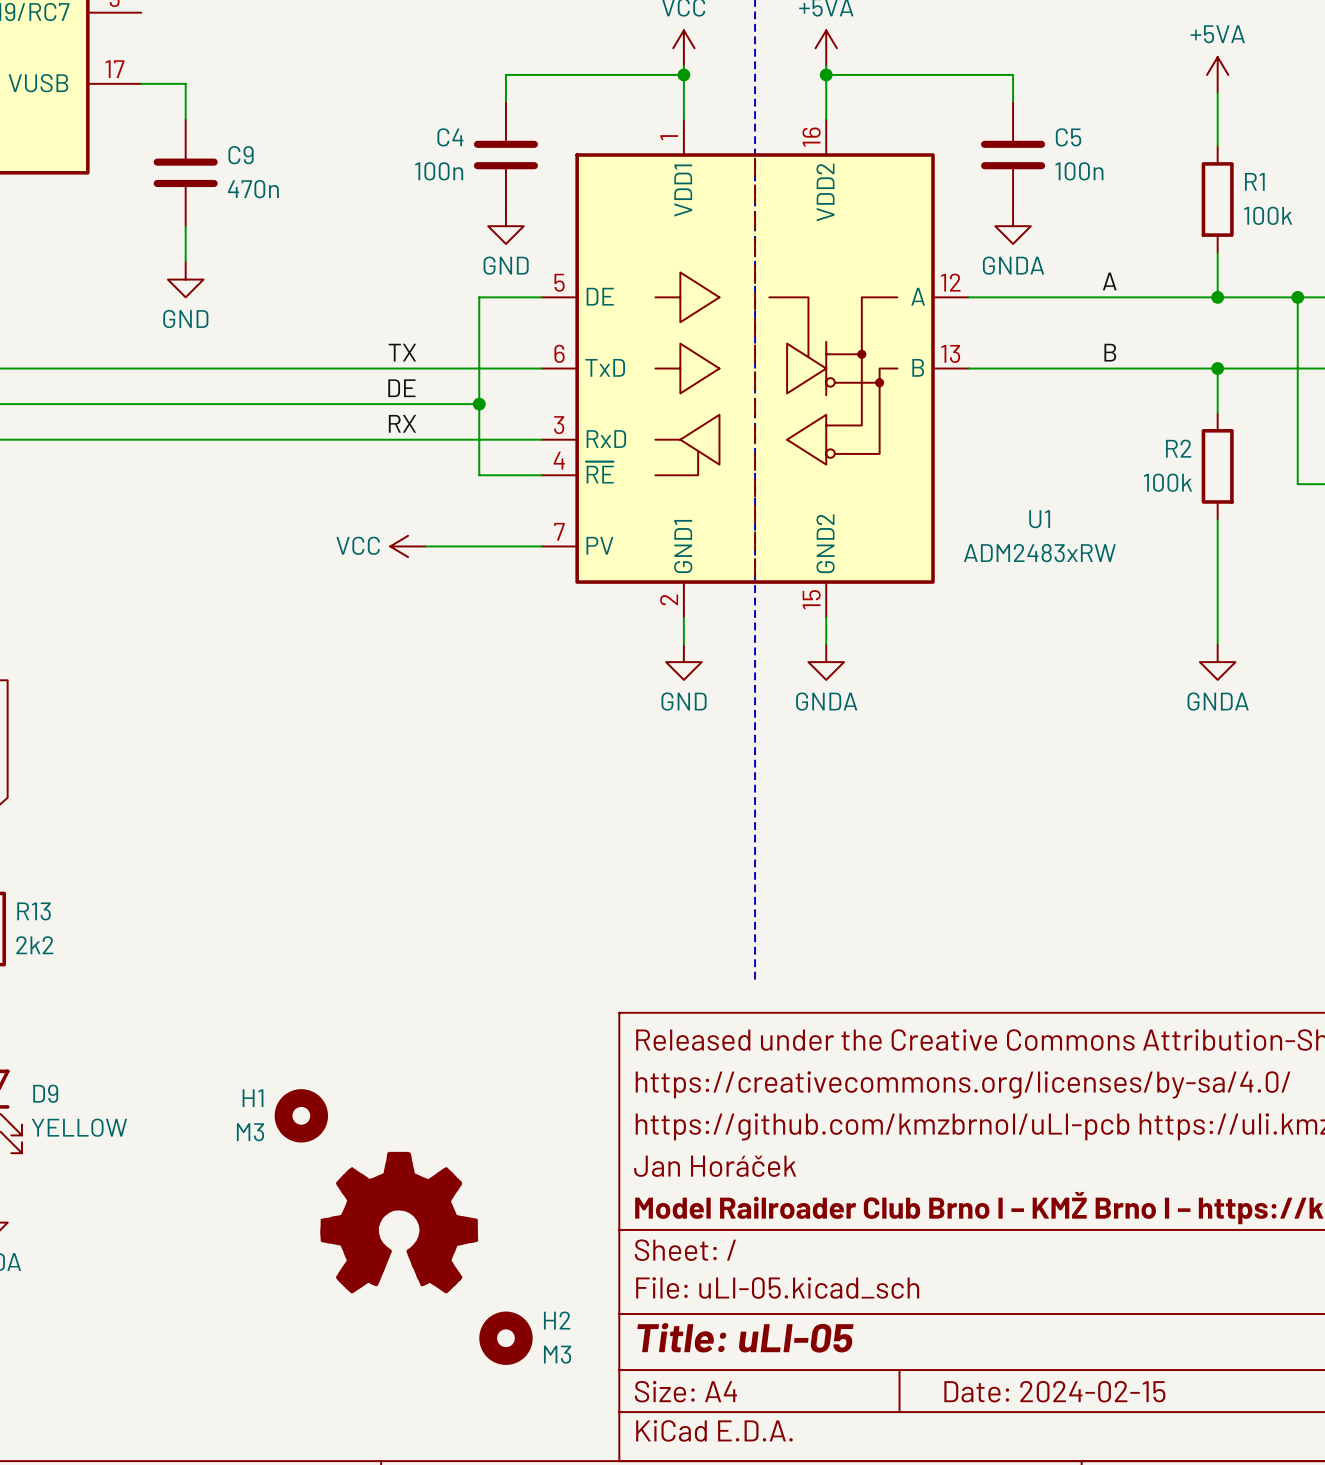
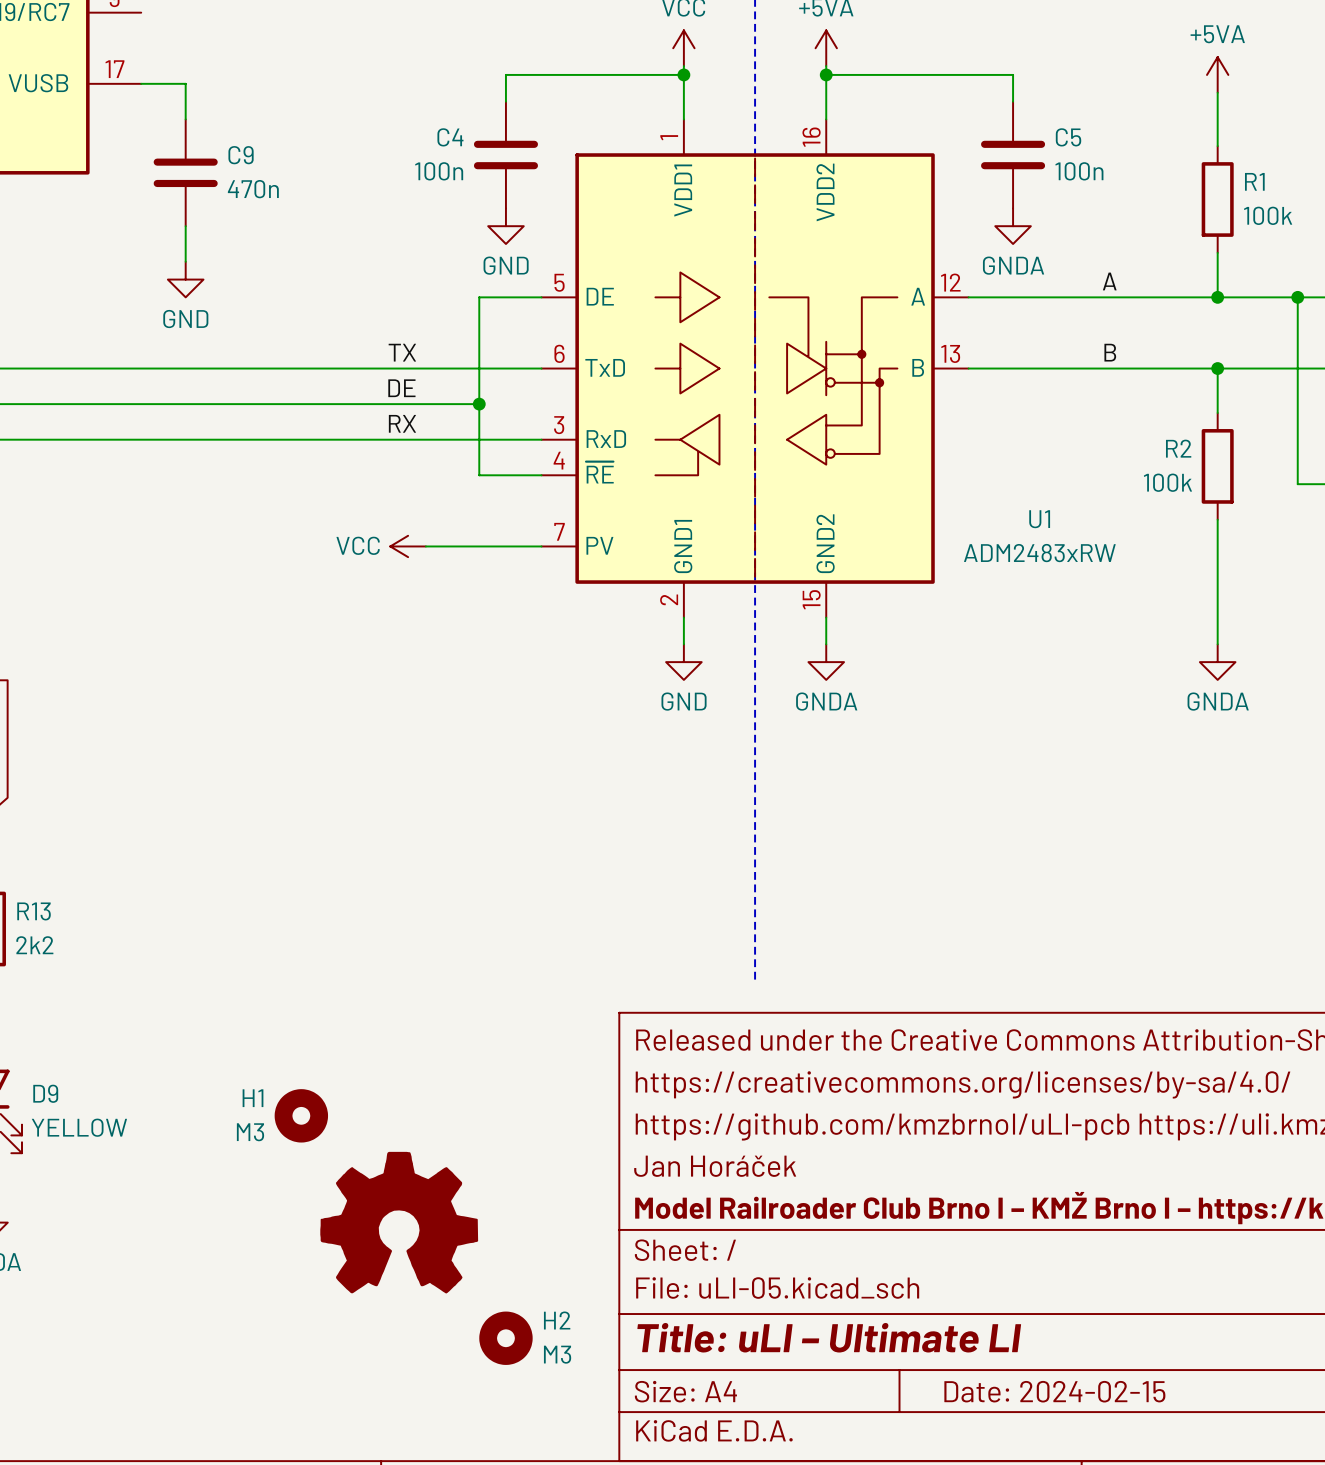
title block: Title: uLI-05 (745, 1337) -> Title: uLI – Ultimate LI (829, 1337)

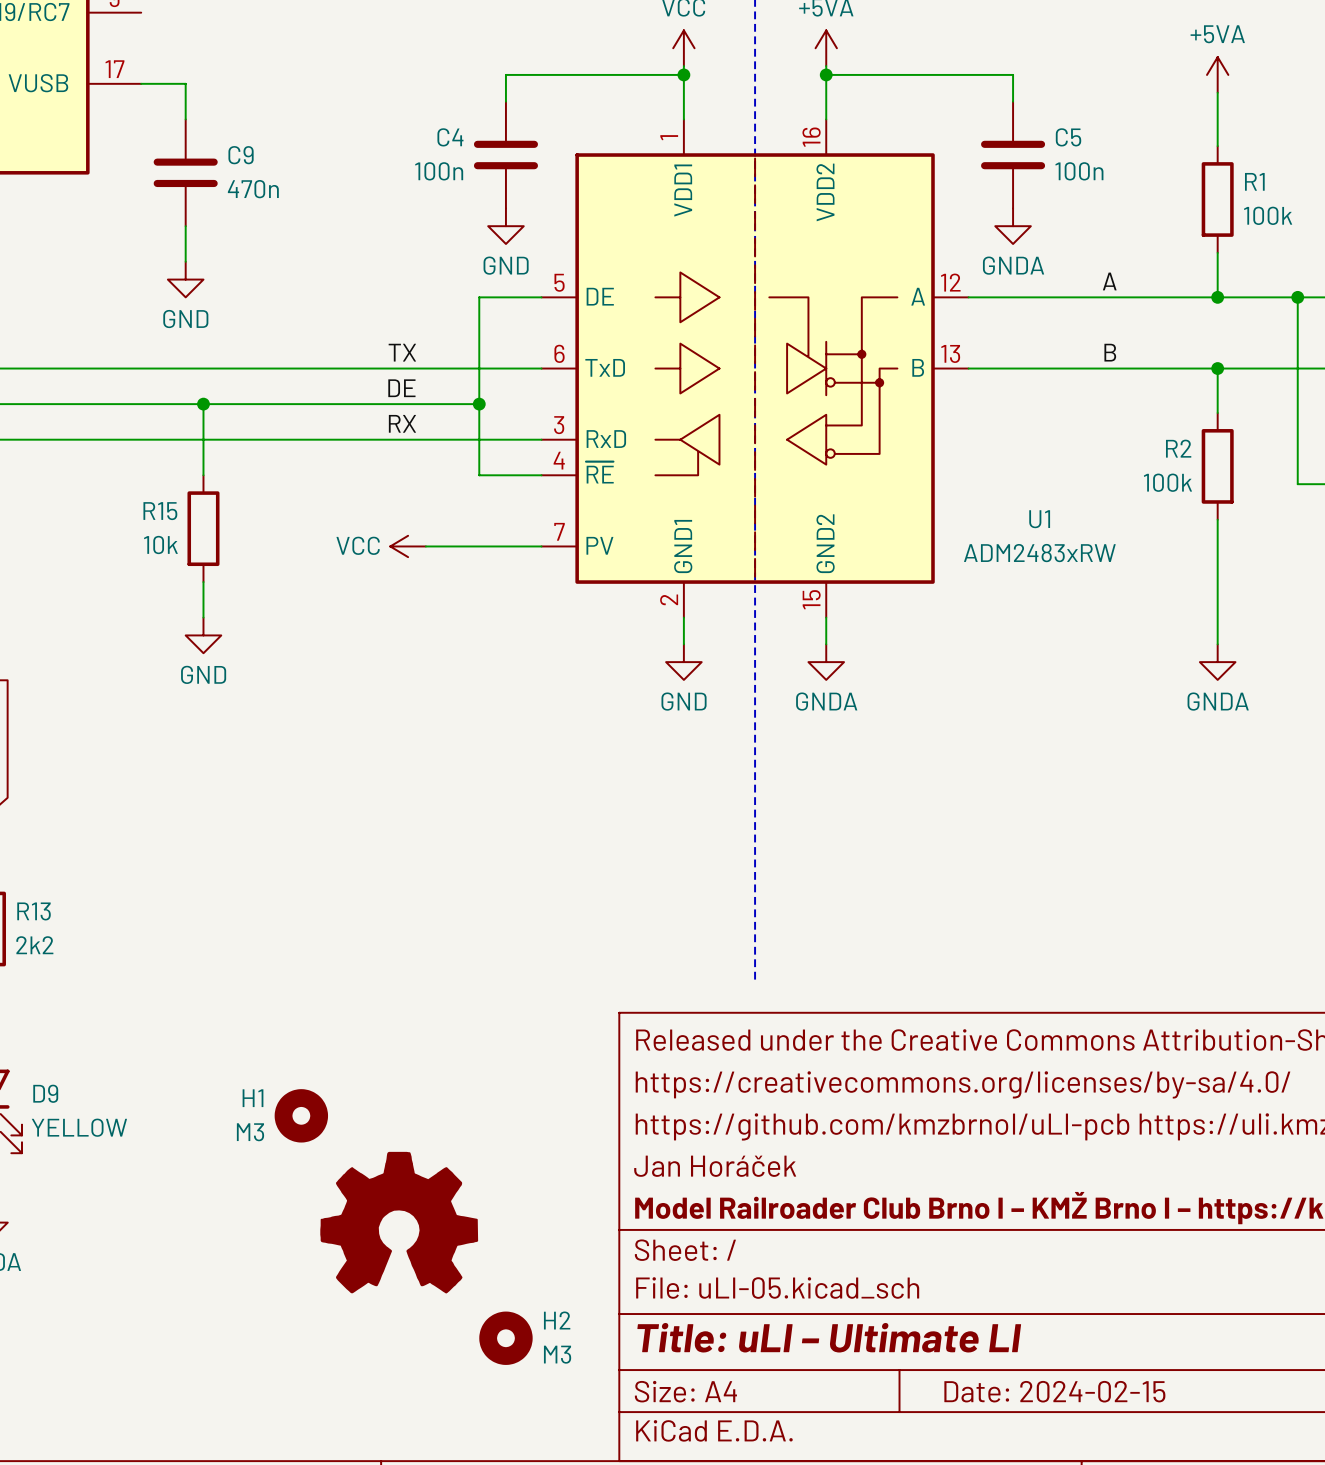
wire: none -> (203, 404) (203, 475)
junction: none -> (203, 404)
R15: none -> 10k (203, 528)
wire: none -> (203, 582) (203, 617)
power symbol: none -> GND (203, 635)

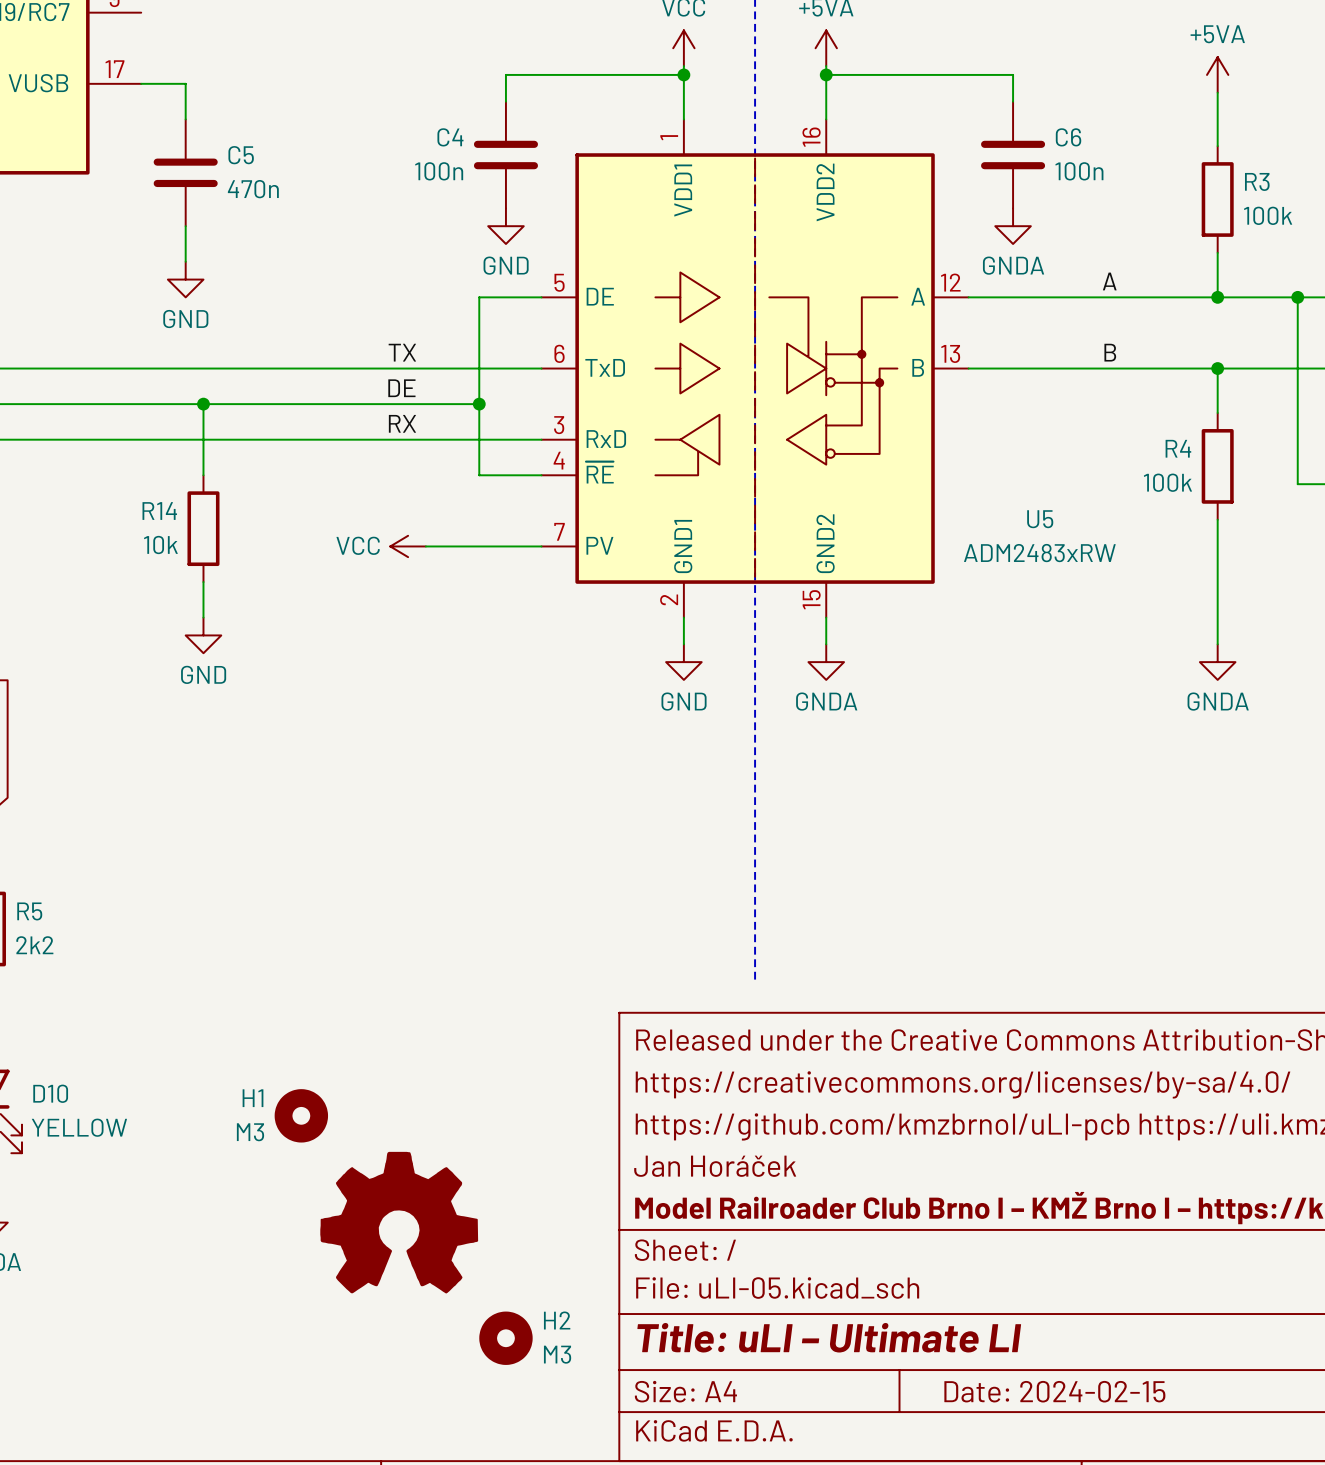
C5 name: C5 (1068, 137) -> C6 (1068, 137)
C9 name: C9 (241, 155) -> C5 (241, 155)
R1 name: R1 (1254, 181) -> R3 (1257, 181)
R2 name: R2 (1178, 448) -> R4 (1178, 448)
R15 name: R15 (160, 511) -> R14 (159, 511)
U1 name: U1 (1039, 519) -> U5 (1040, 519)
R13 name: R13 (34, 911) -> R5 (29, 911)
D9 name: D9 (45, 1093) -> D10 (50, 1093)

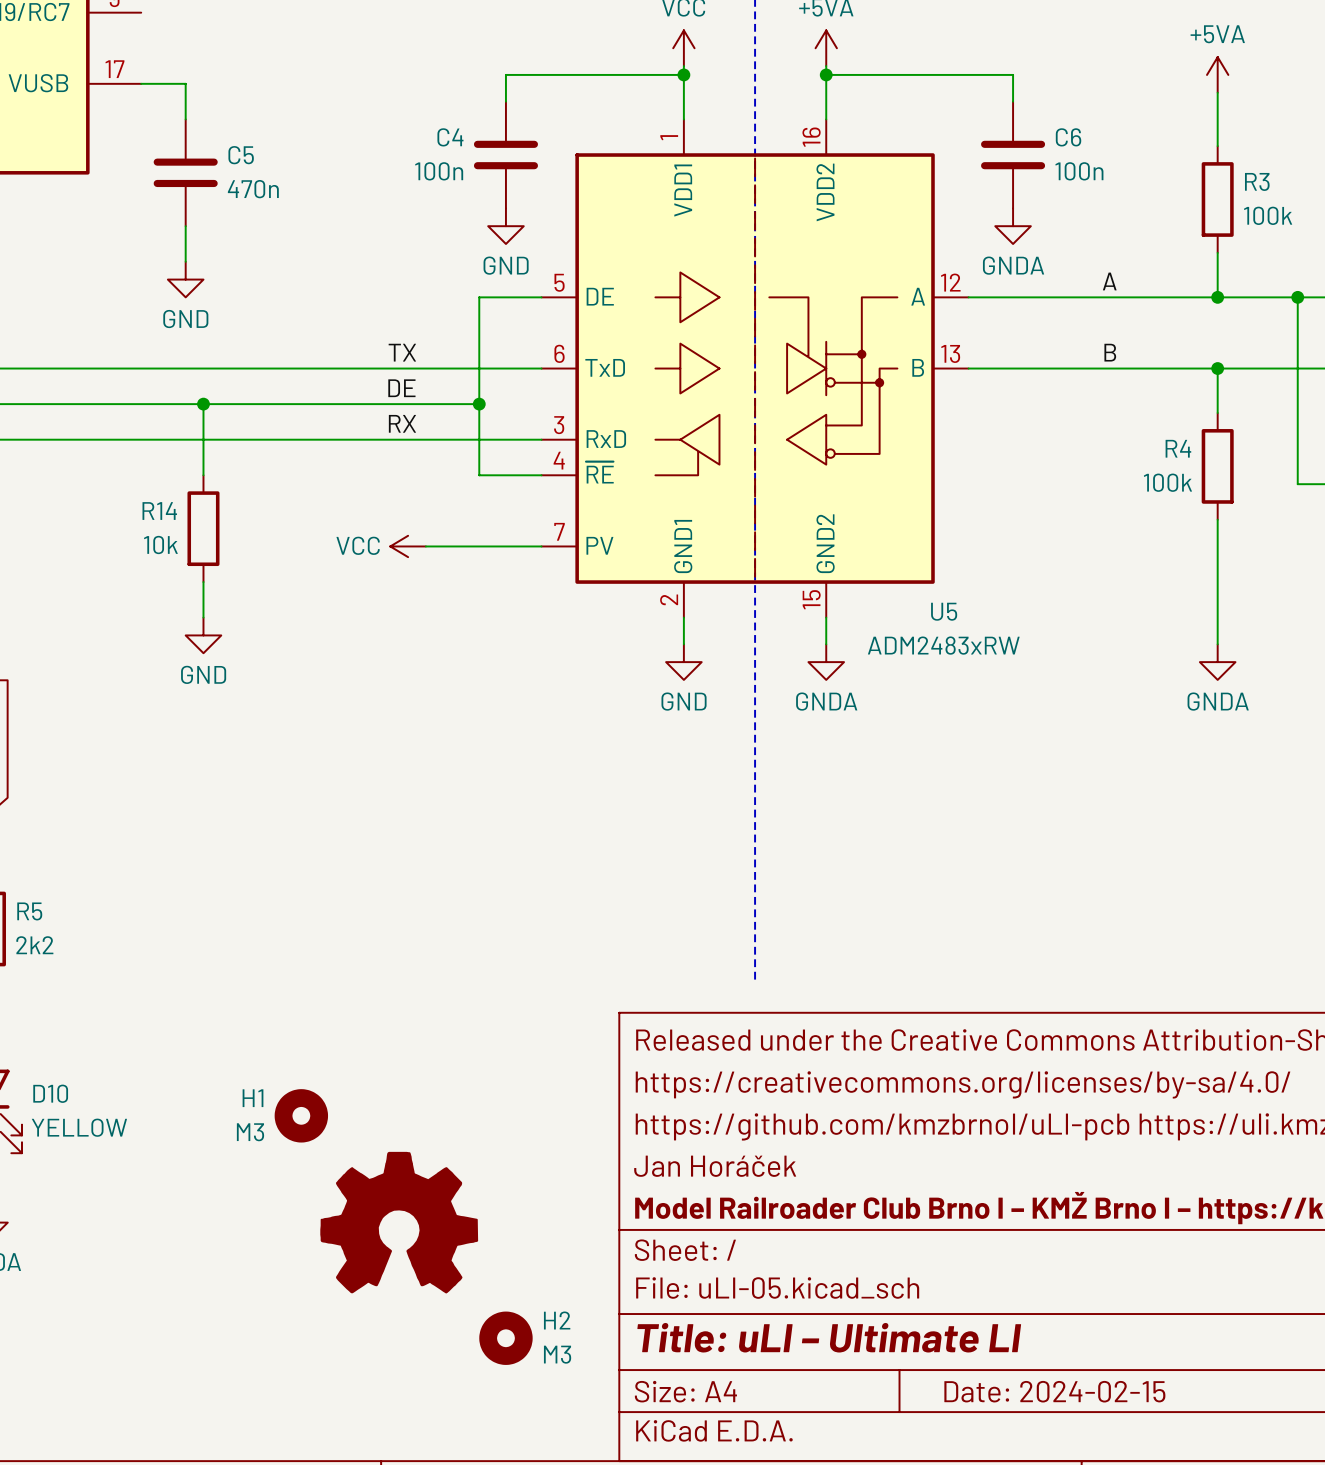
U5 name position: U5 (1040, 519) -> U5 (944, 611)
U5 value position: ADM2483xRW (1039, 553) -> ADM2483xRW (943, 645)

